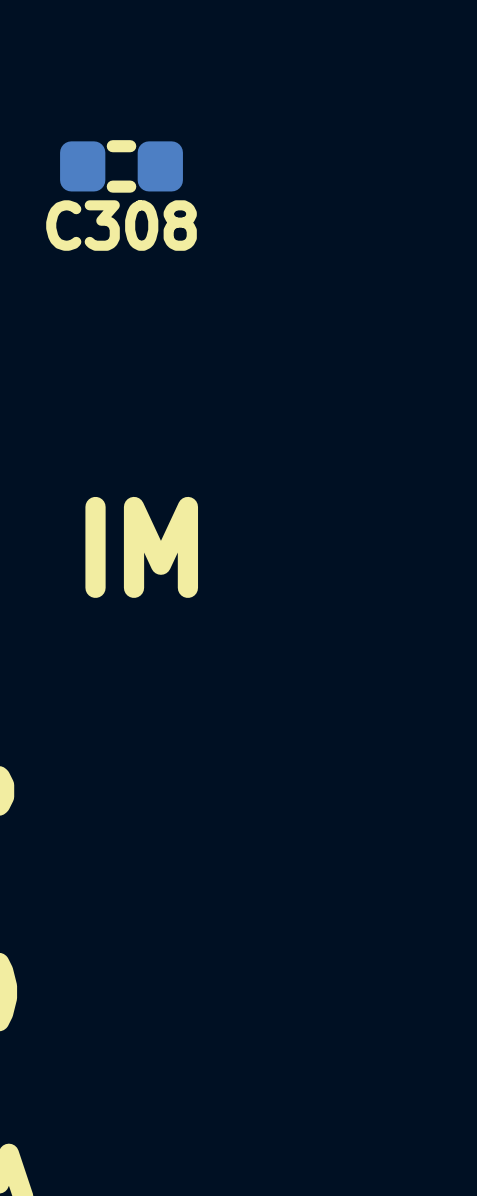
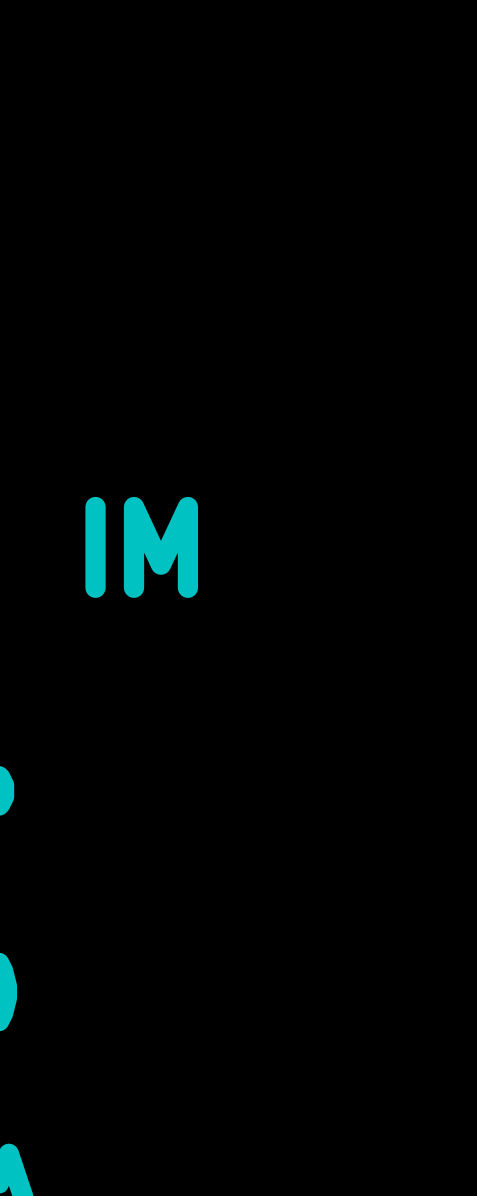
C308: (121, 166) -> none

